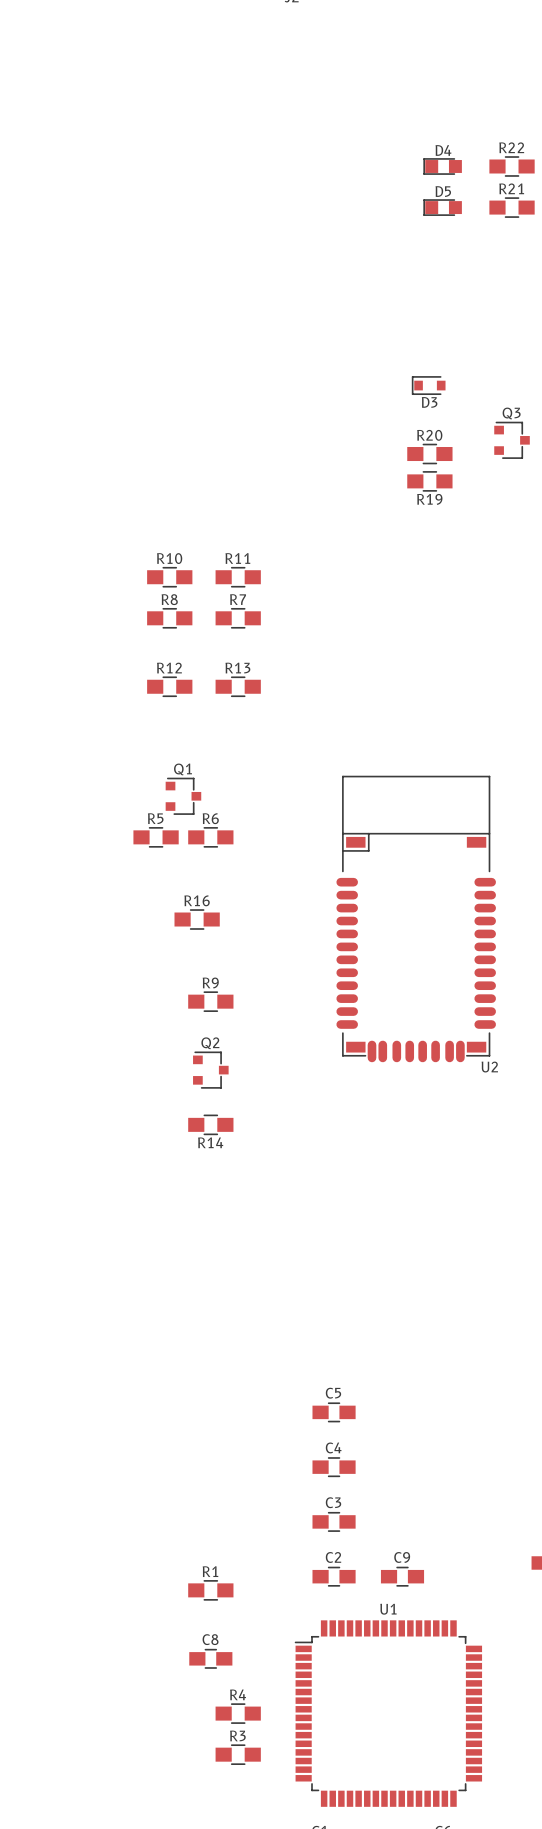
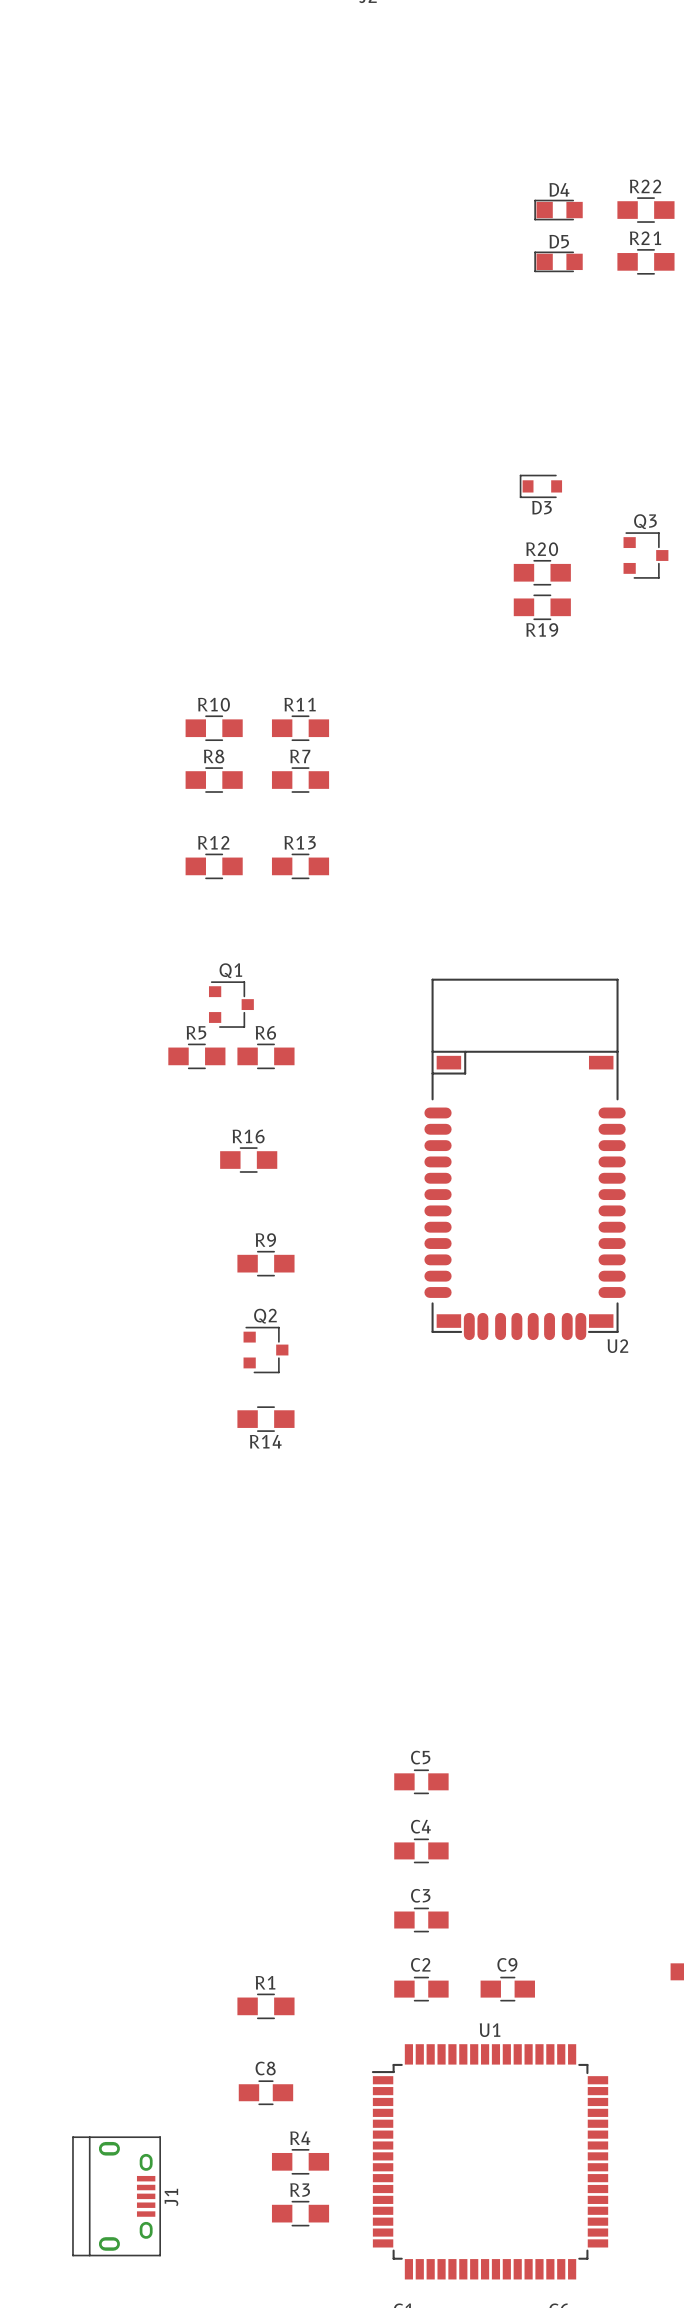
J1: none -> (116, 2196)

